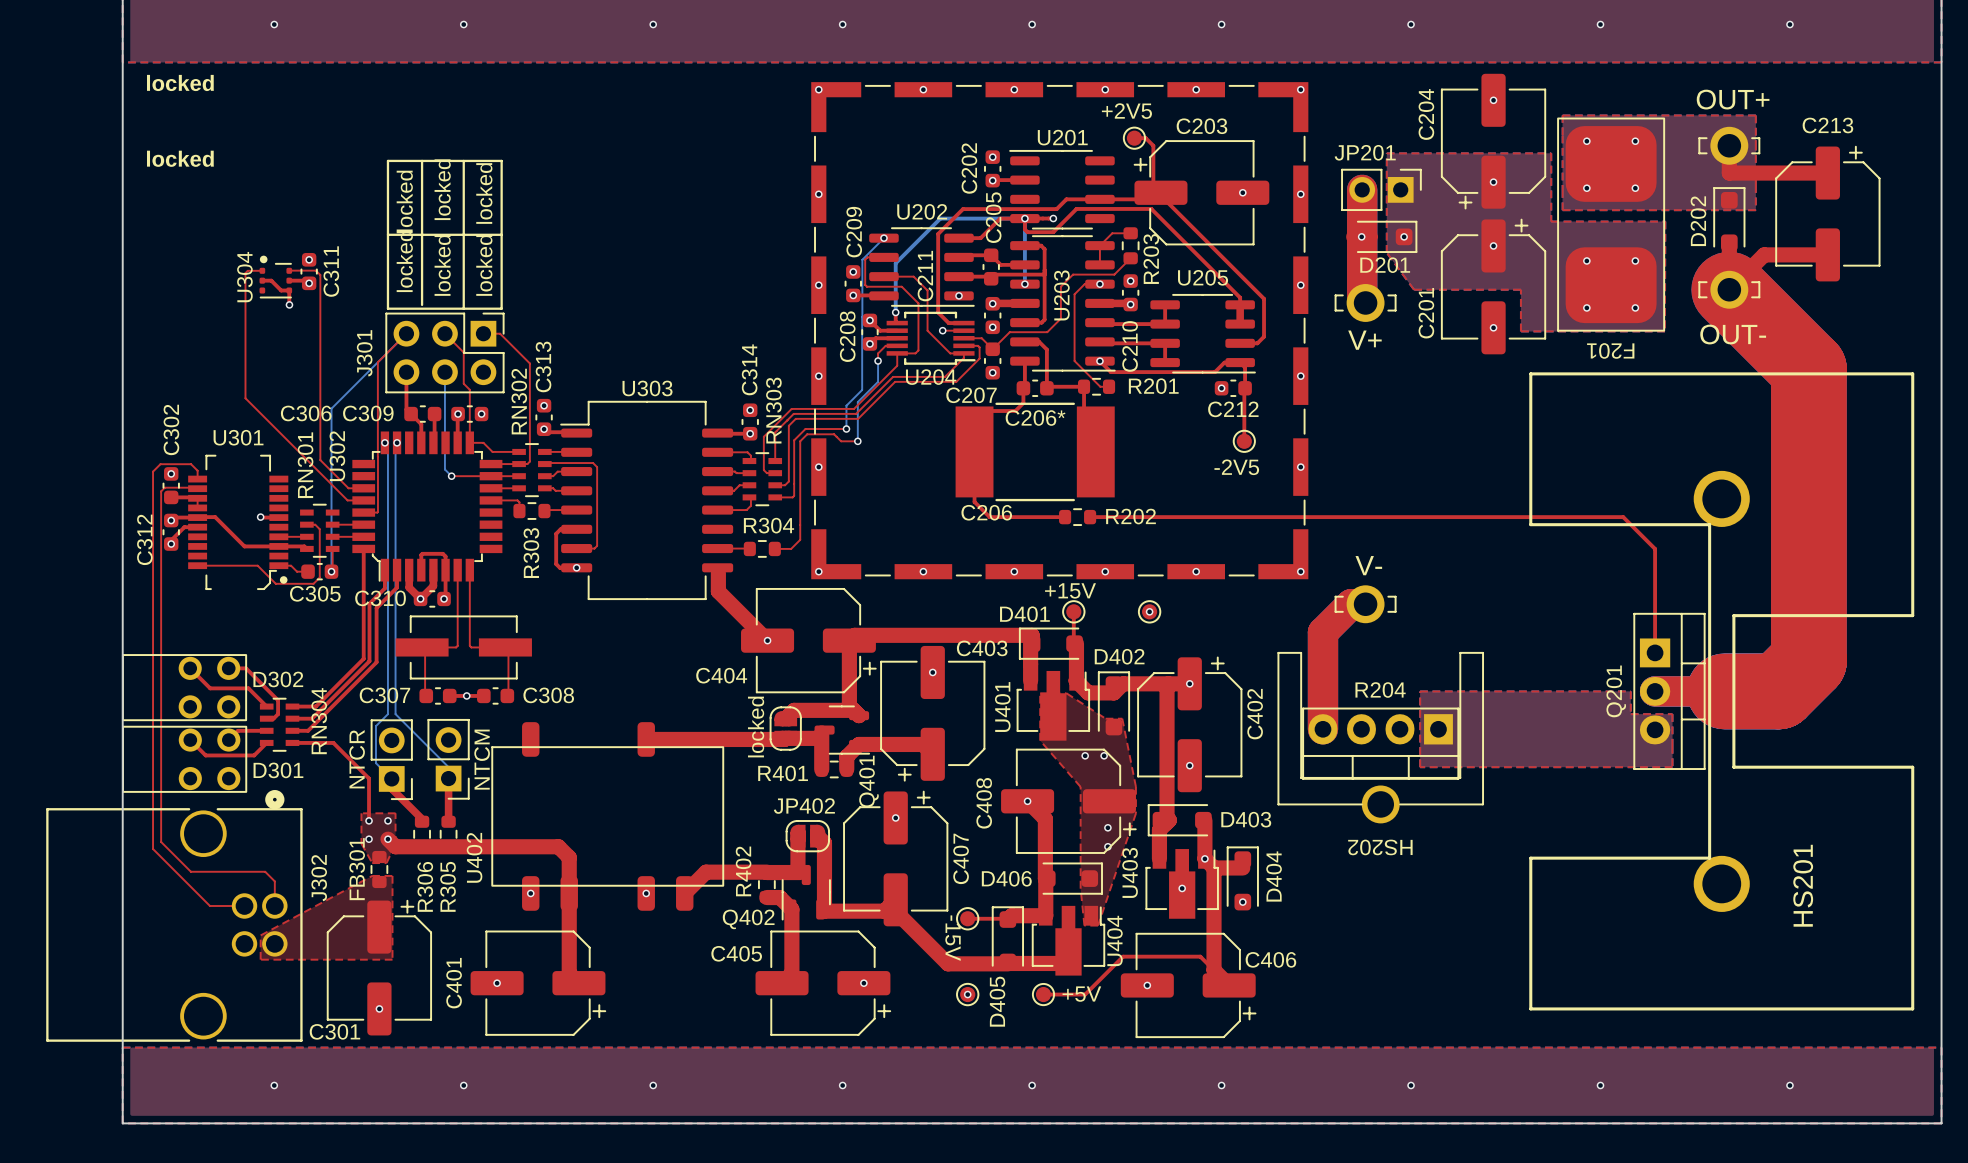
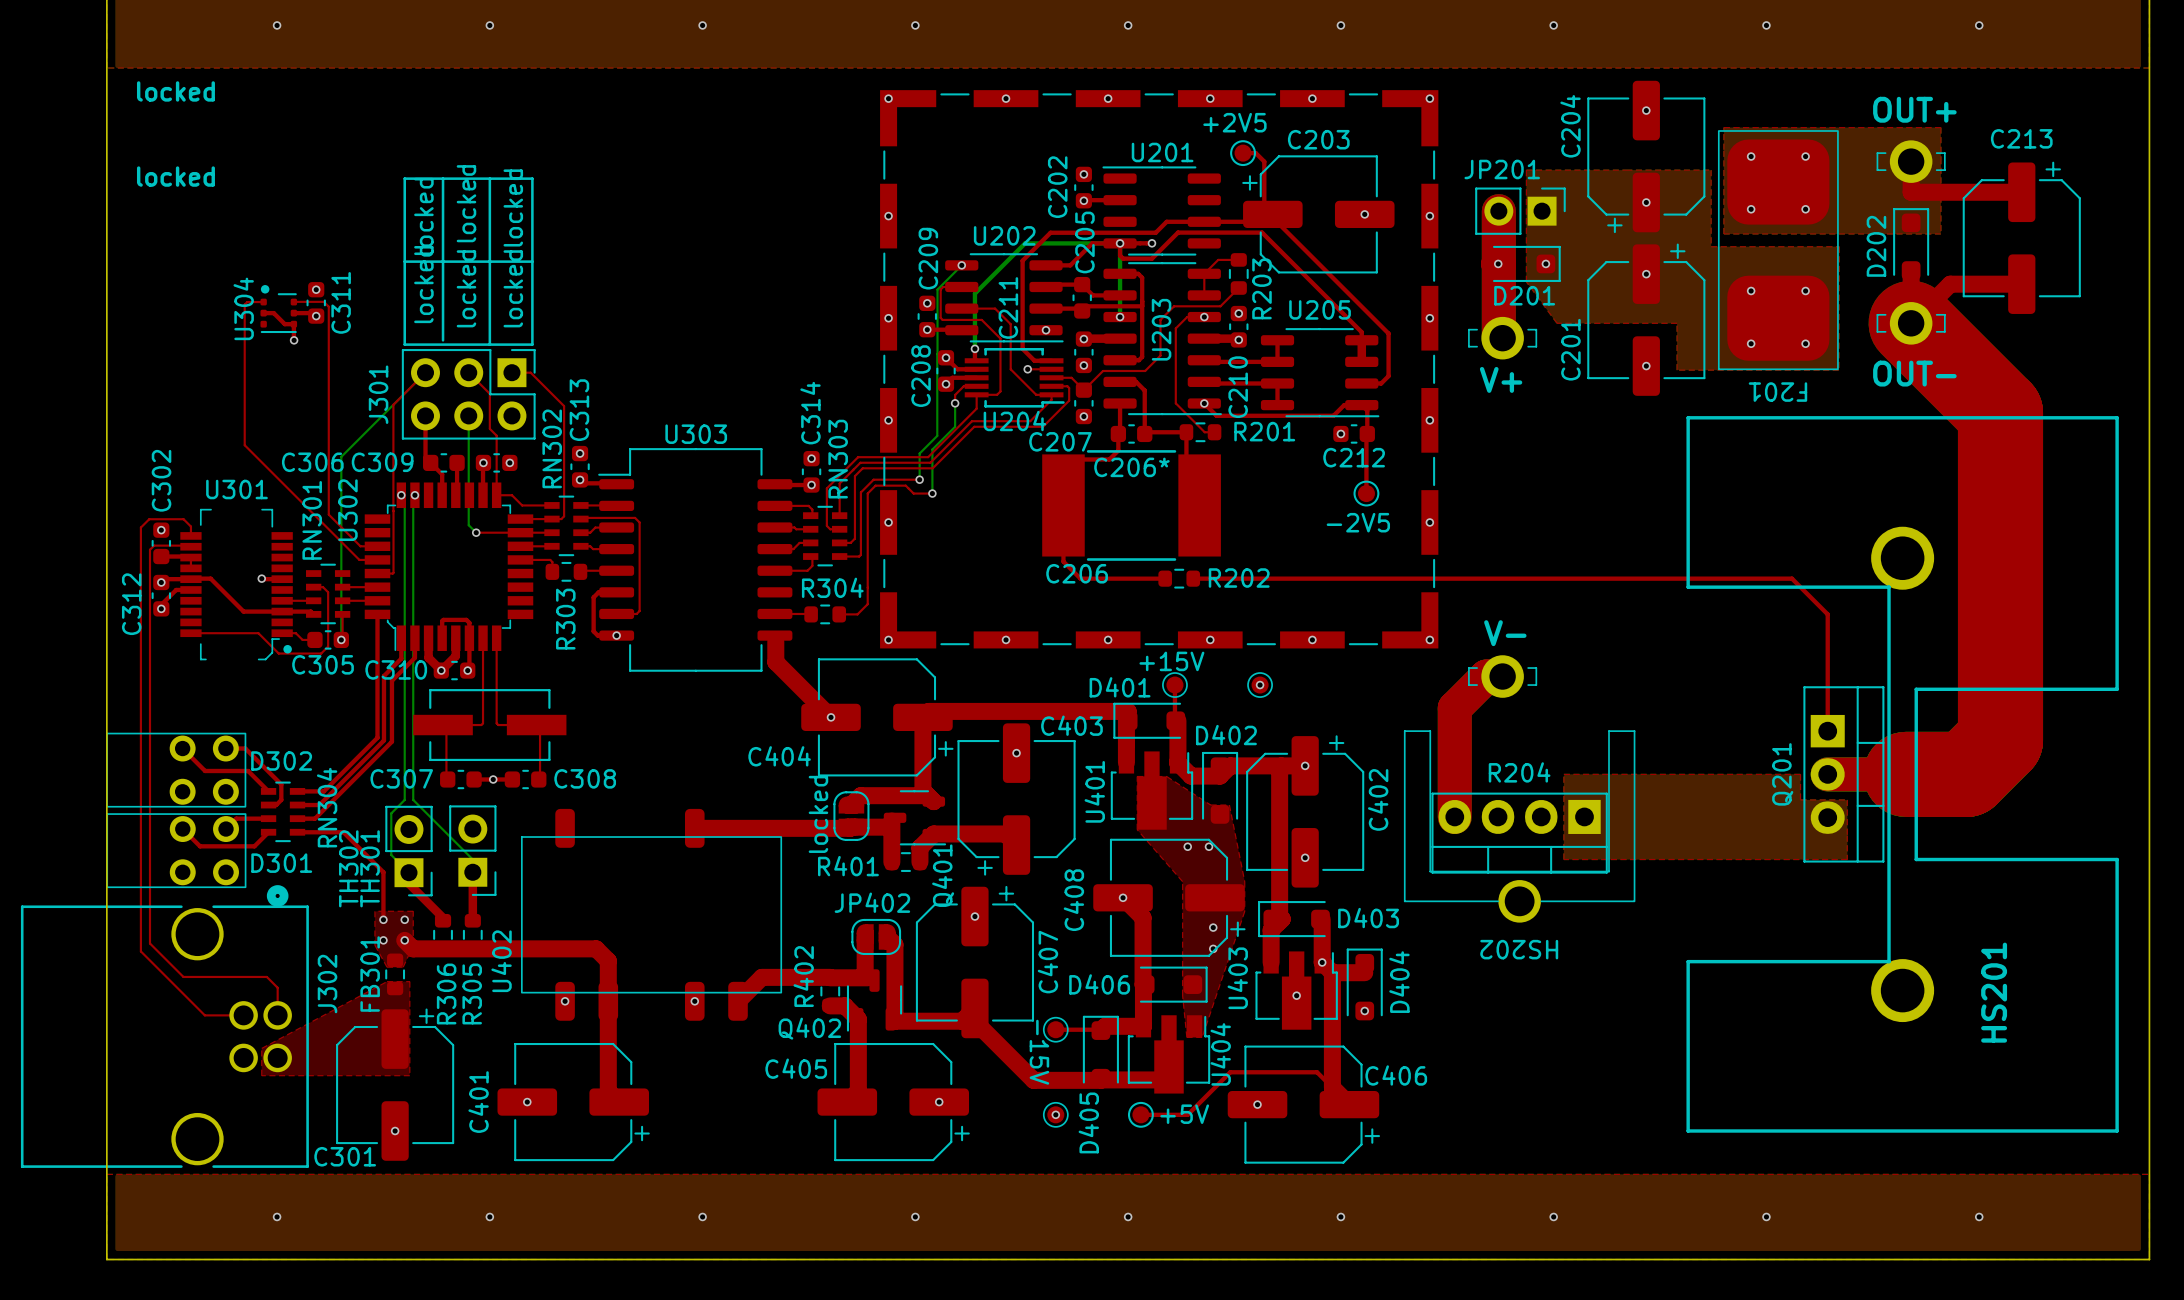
NTCR name: NTCR (357, 759) -> TH302 (348, 868)
NTCM name: NTCM (482, 759) -> TH301 (370, 868)

